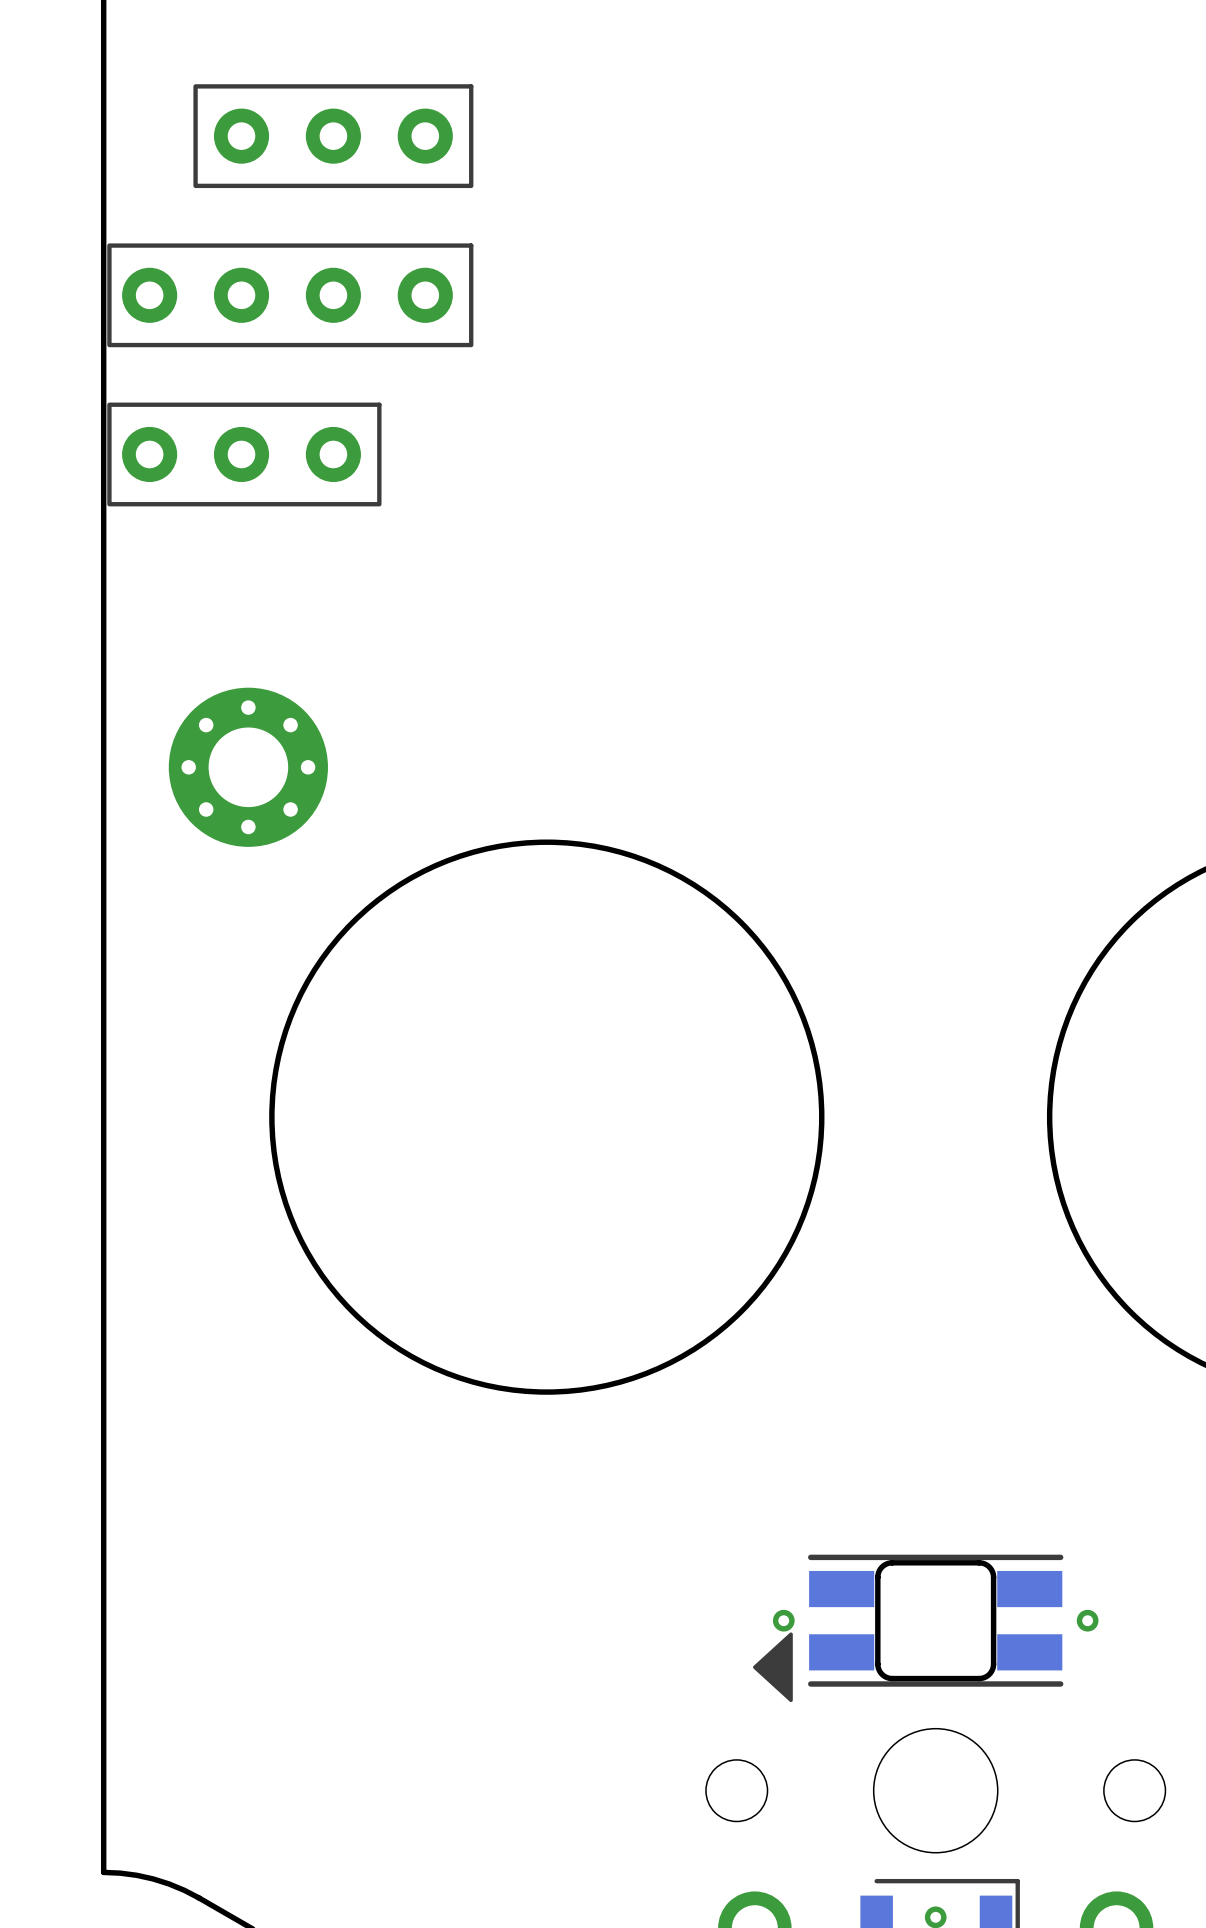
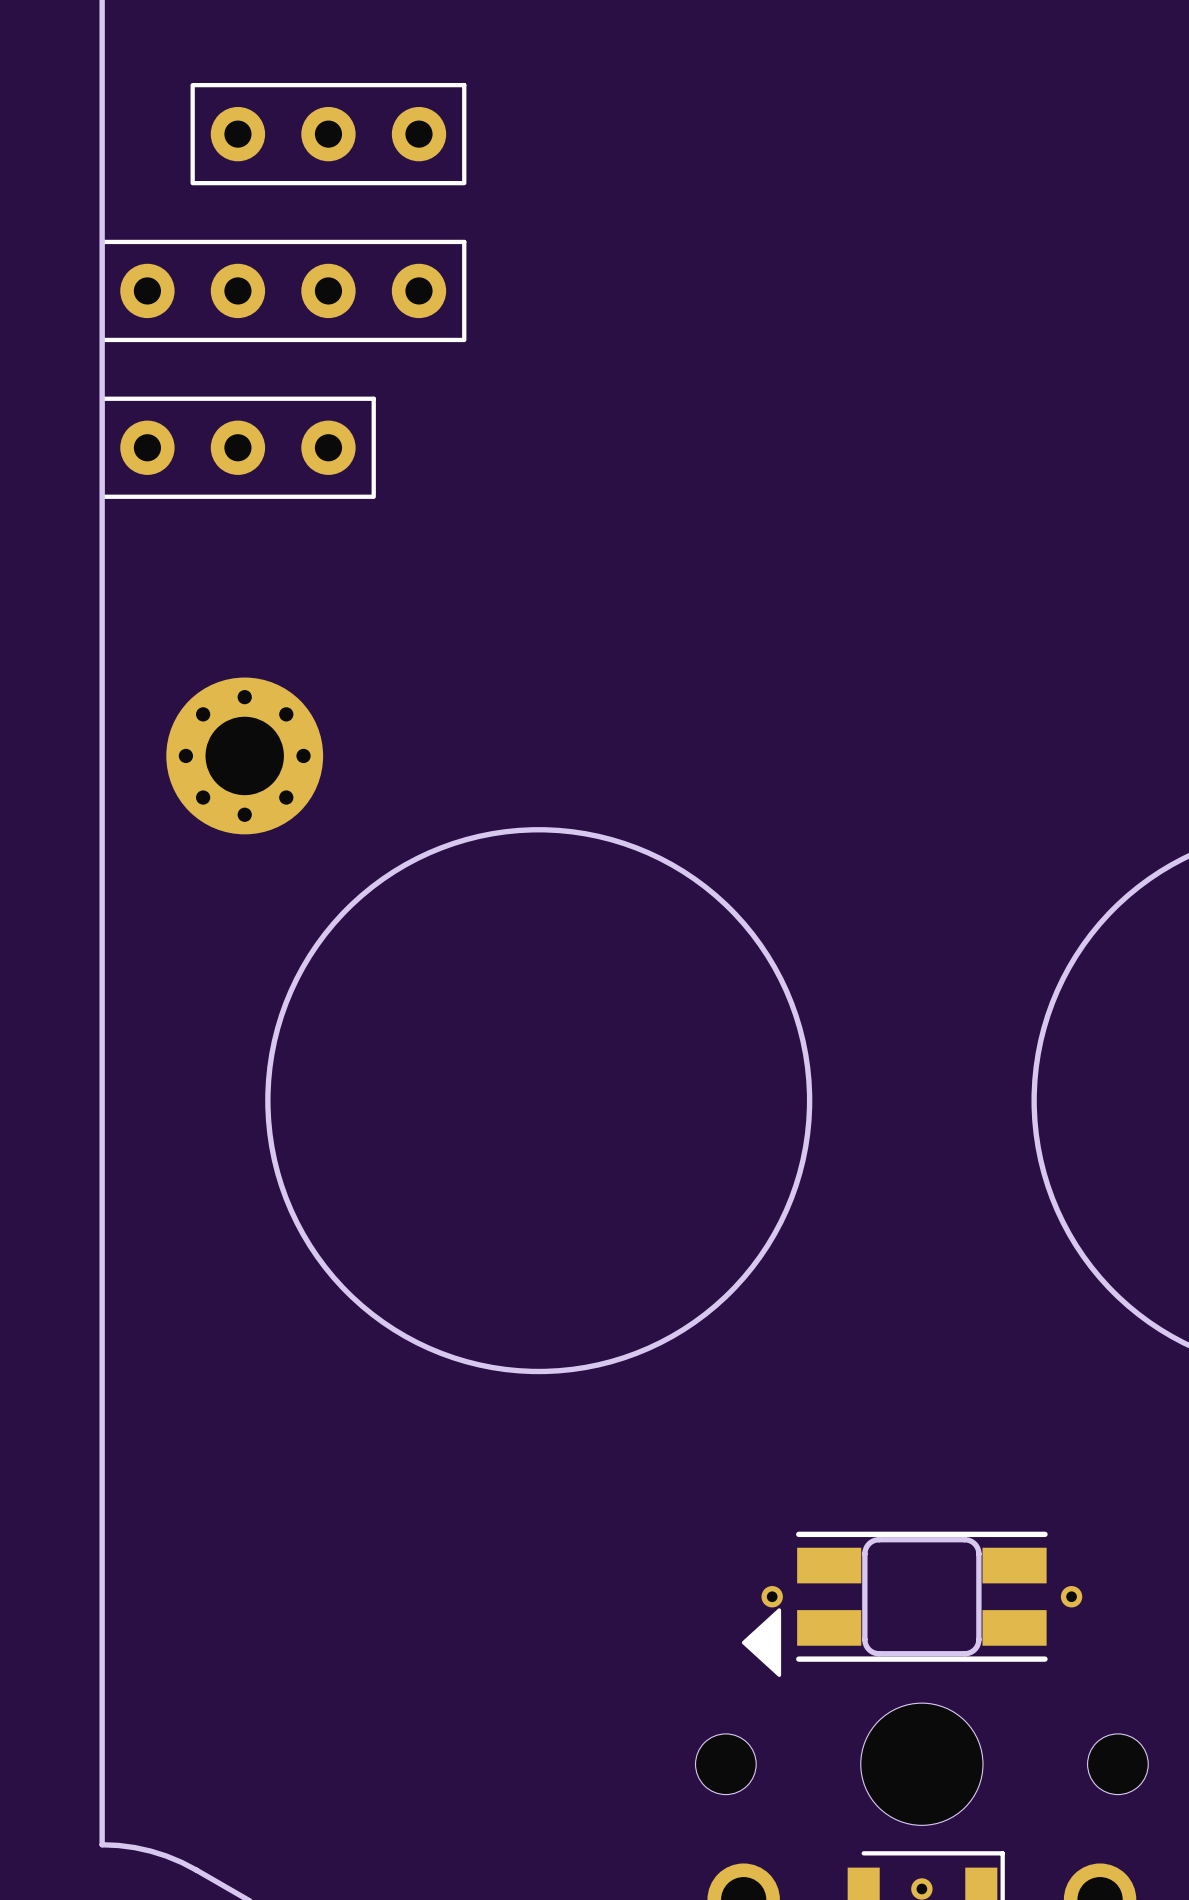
part footprint: [107, 84, 474, 507] -> [100, 82, 467, 499]

